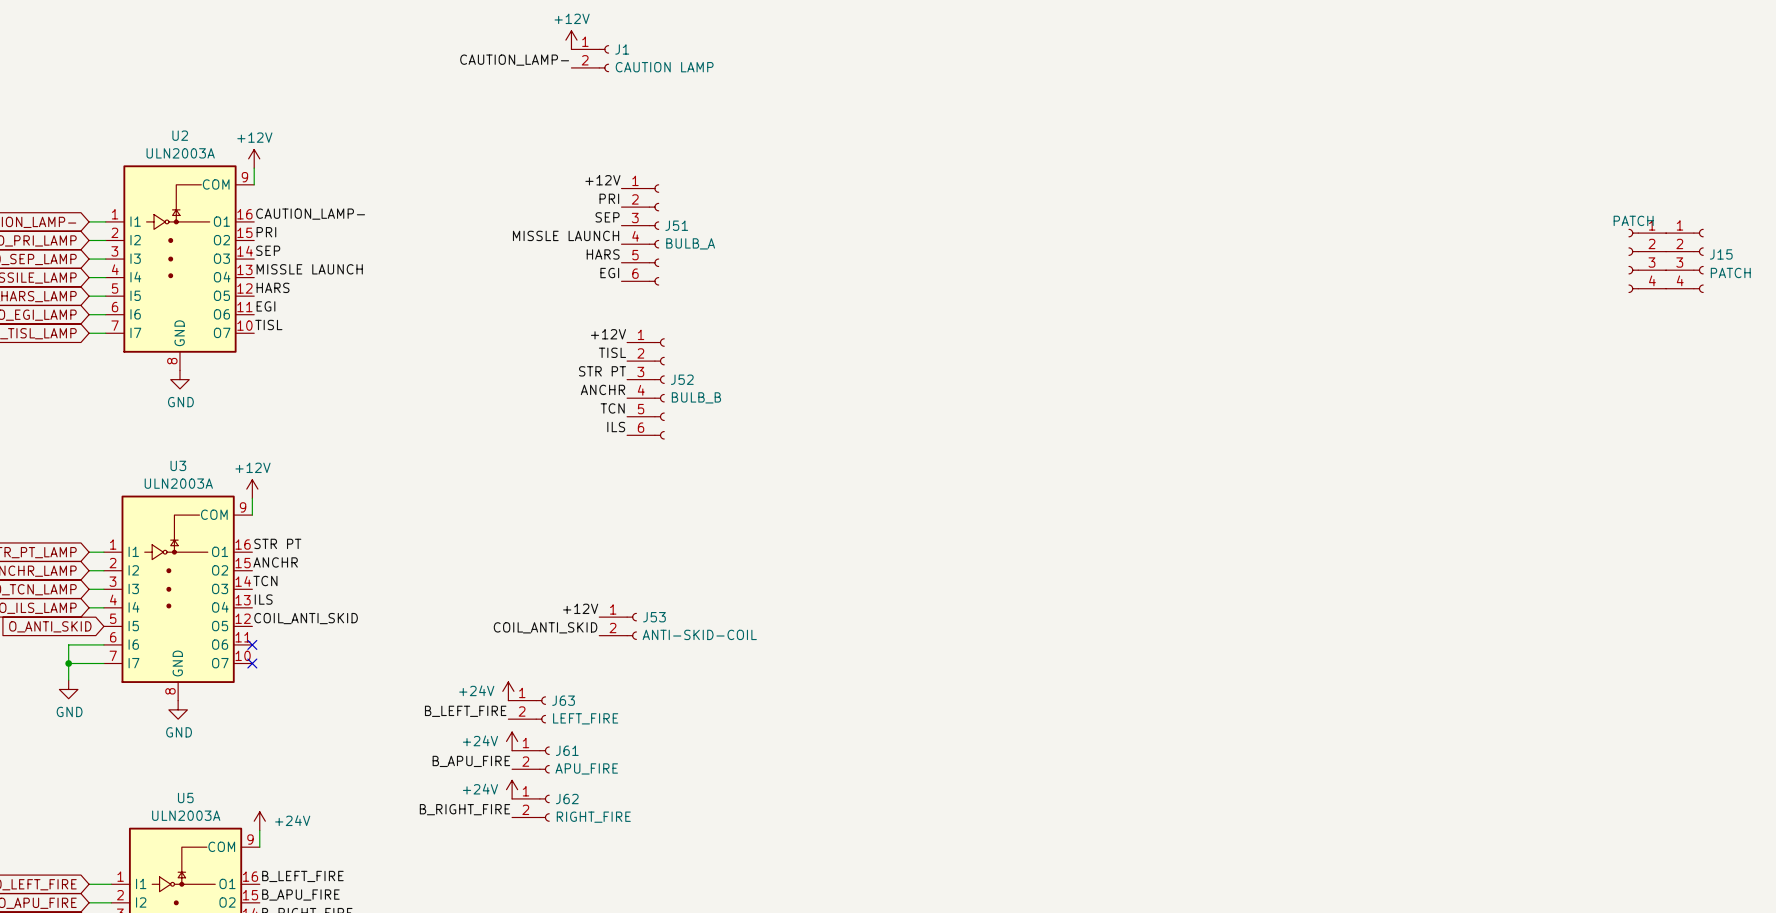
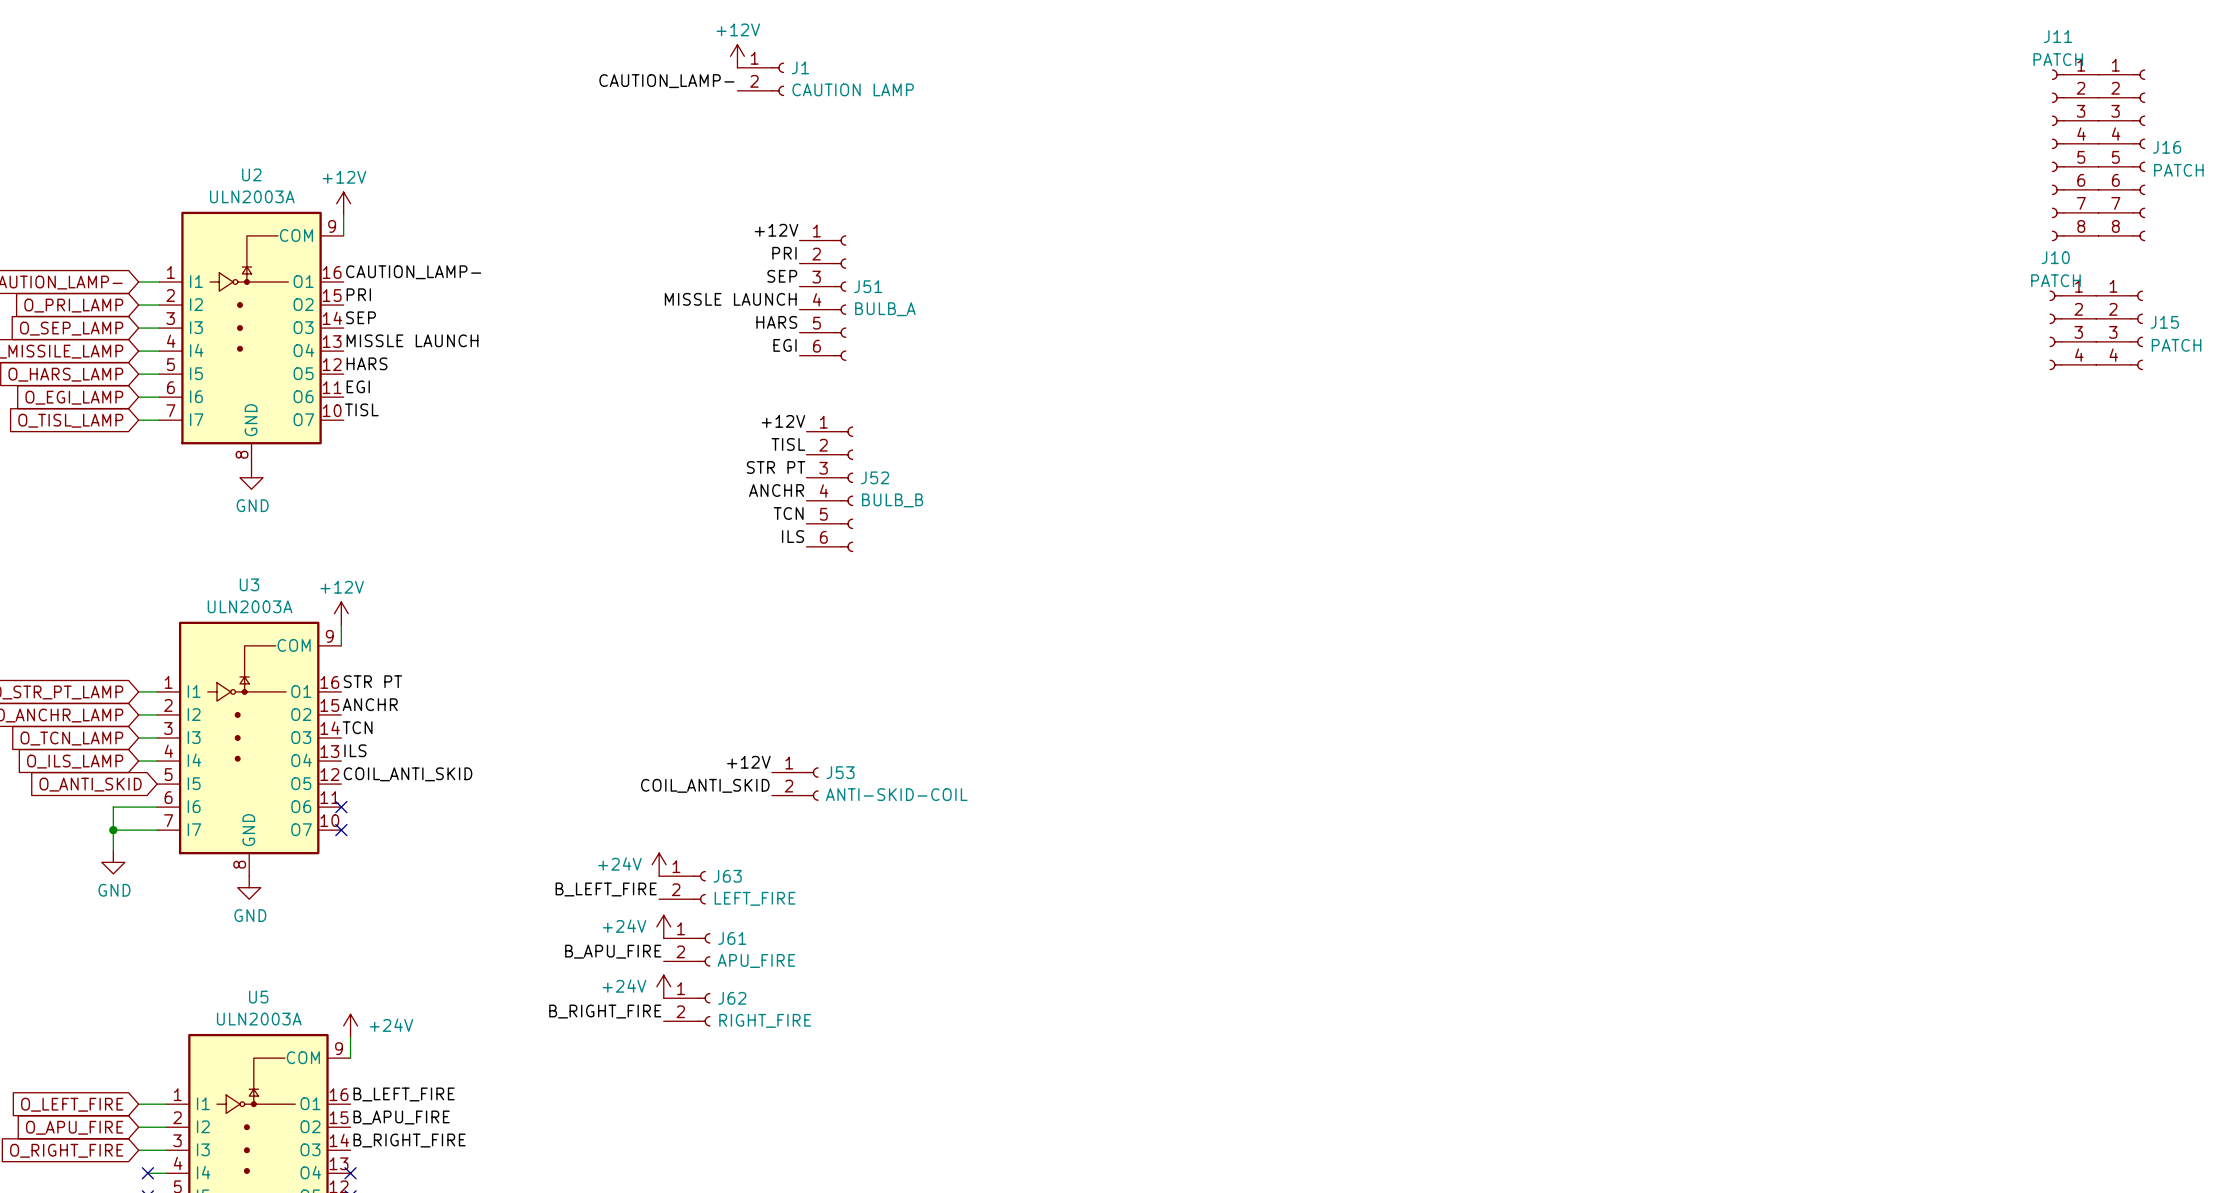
J11: none -> PATCH (2075, 155)
J16: none -> PATCH (2121, 155)
J10 name: none -> J10 (2055, 257)

